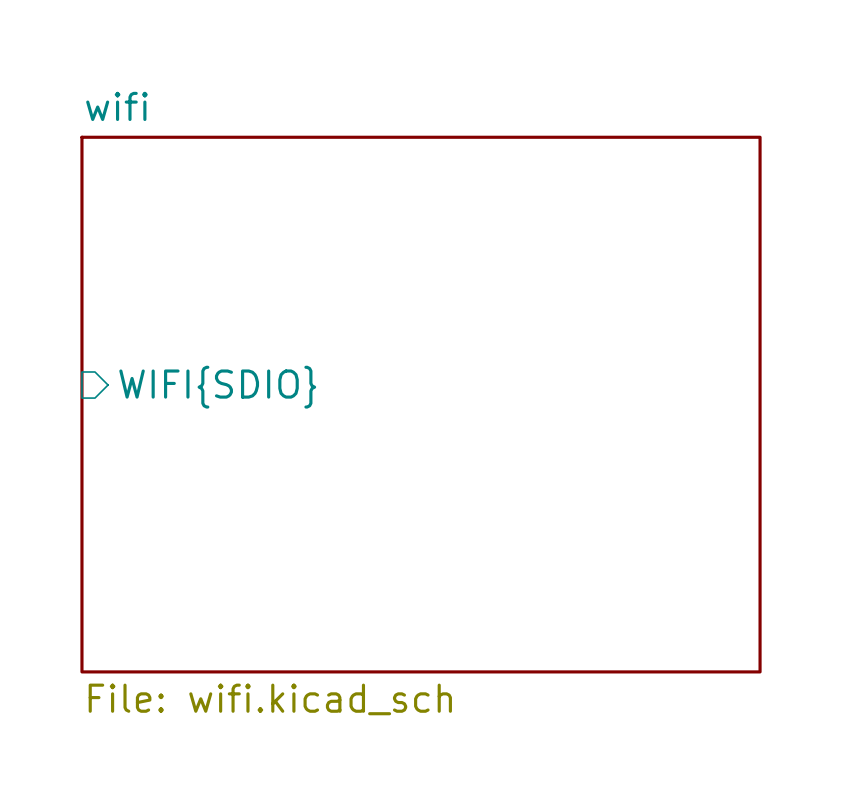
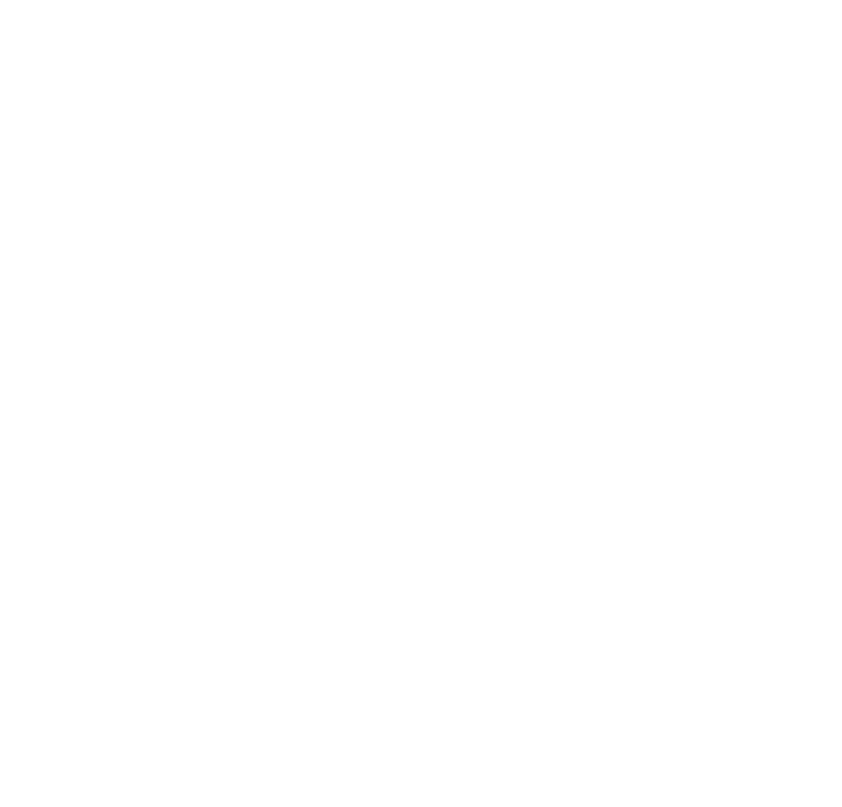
sheet pin: WIFI{SDIO} (217, 387) -> none
sheet wifi: File: wifi.kicad_sch (421, 404) -> none

